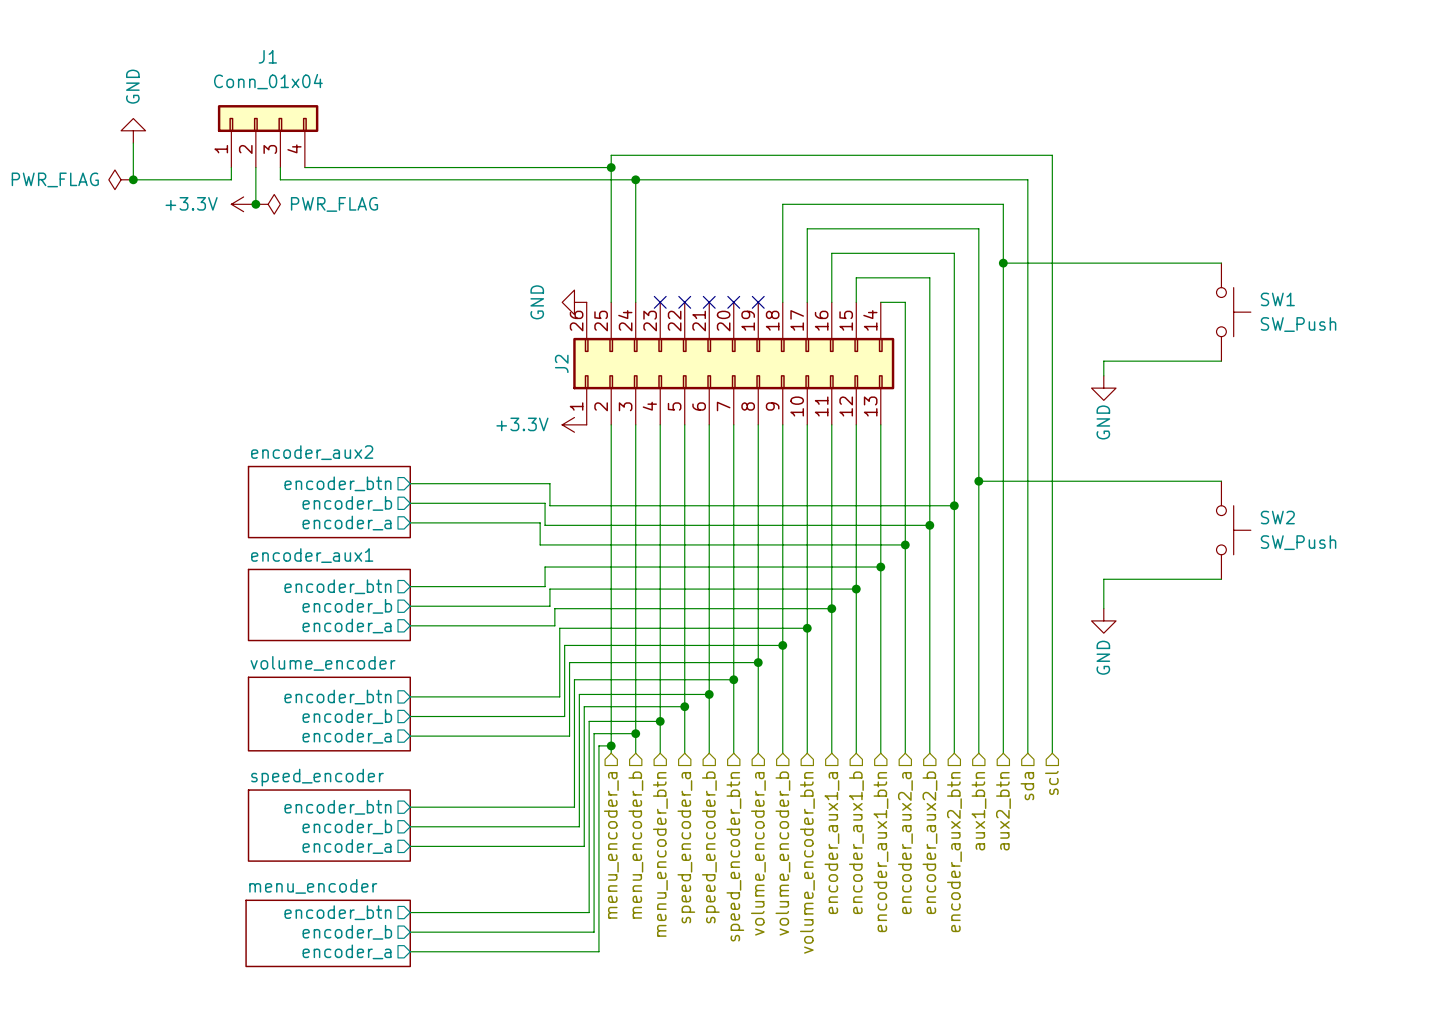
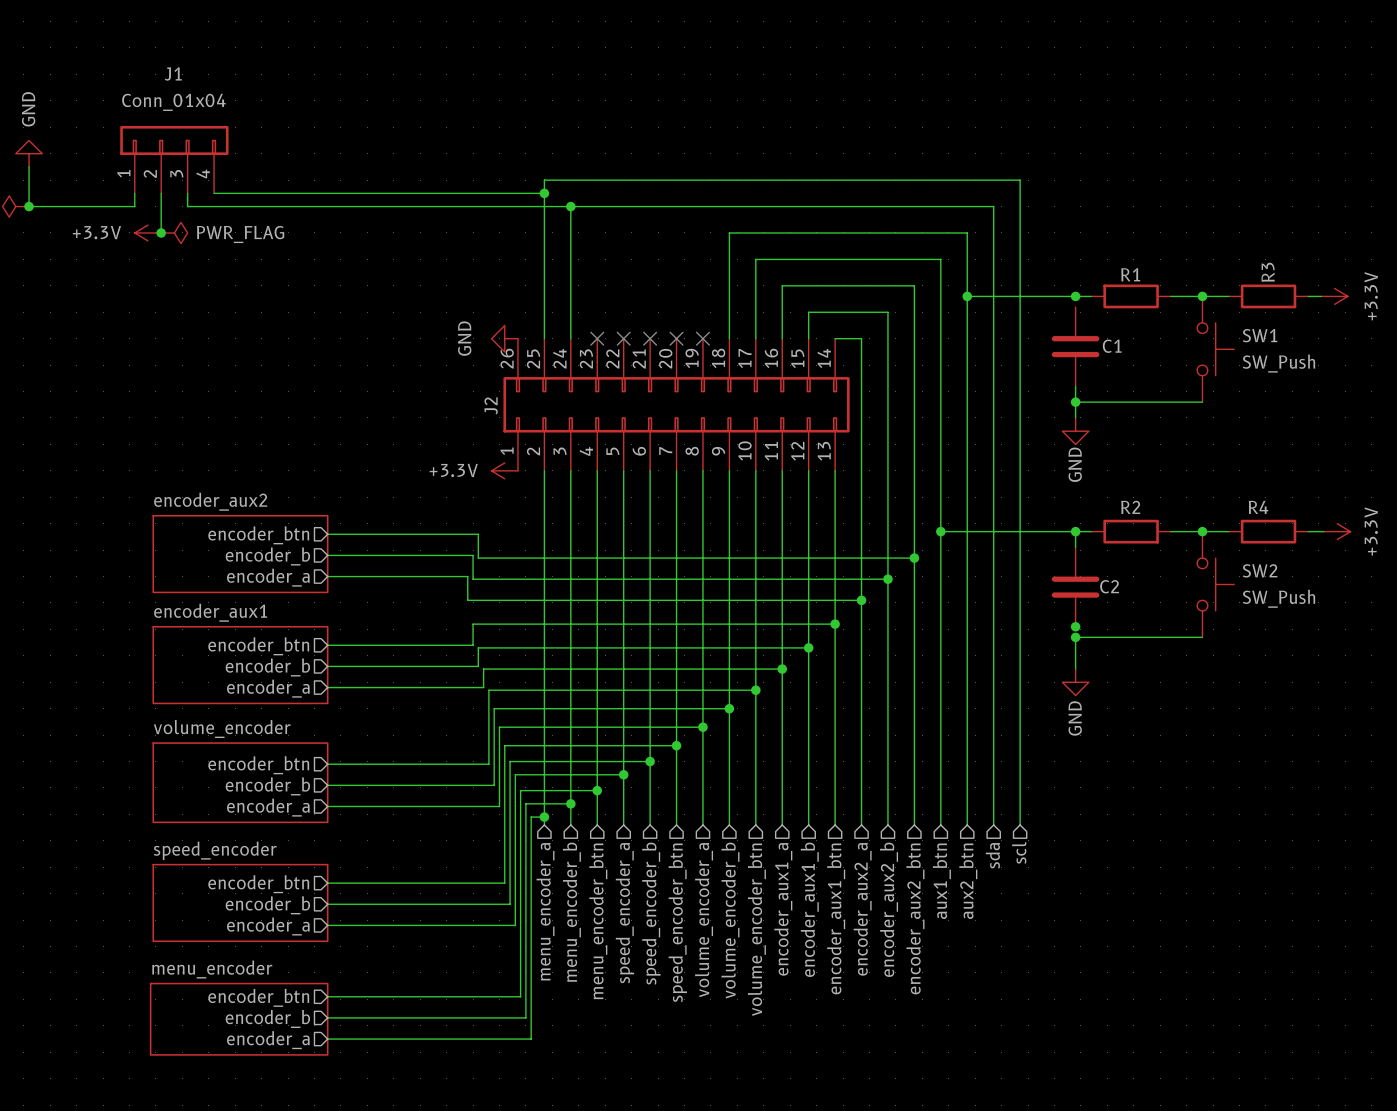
junction: none -> (1075, 296)
wire: (1118, 263) (1192, 263) -> none
R1: none -> (1131, 296)
wire: none -> (1202, 296) (1228, 296)
junction: none -> (1202, 296)
R3: none -> (1268, 296)
wire: none -> (1308, 296) (1321, 296)
power symbol: none -> +3.3V (1334, 296)
C1: none -> (1075, 346)
wire: none -> (1075, 386) (1075, 402)
junction: none -> (1075, 402)
wire: none -> (1075, 531) (1075, 547)
junction: none -> (1075, 531)
wire: (1118, 481) (1192, 481) -> none
R2: none -> (1131, 531)
wire: none -> (1202, 531) (1228, 531)
junction: none -> (1202, 531)
R4: none -> (1268, 531)
wire: none -> (1308, 531) (1324, 531)
power symbol: none -> +3.3V (1337, 531)
C2: none -> (1075, 587)
junction: none -> (1075, 626)
junction: none -> (1075, 637)

